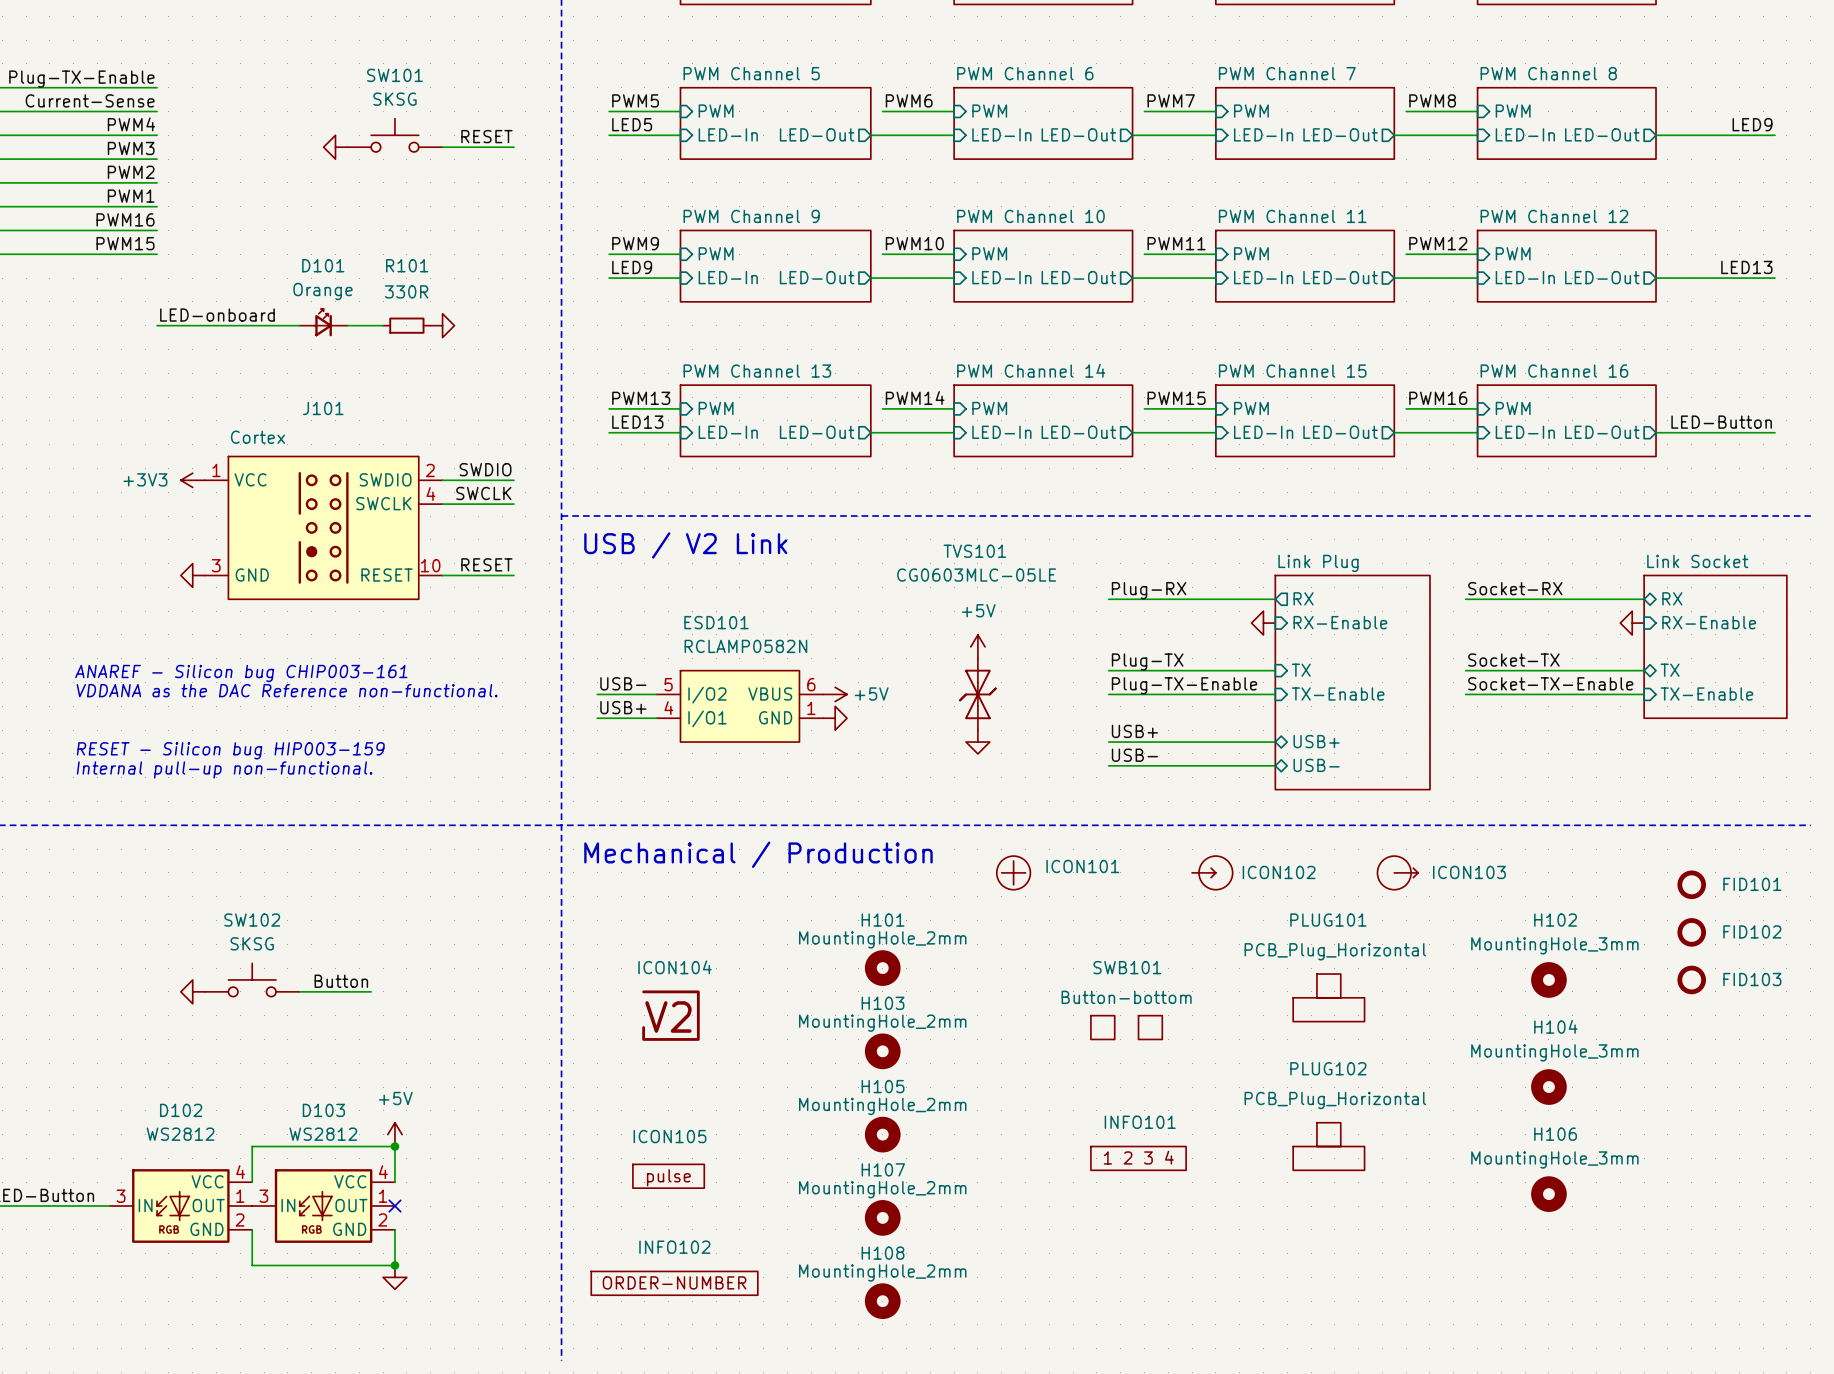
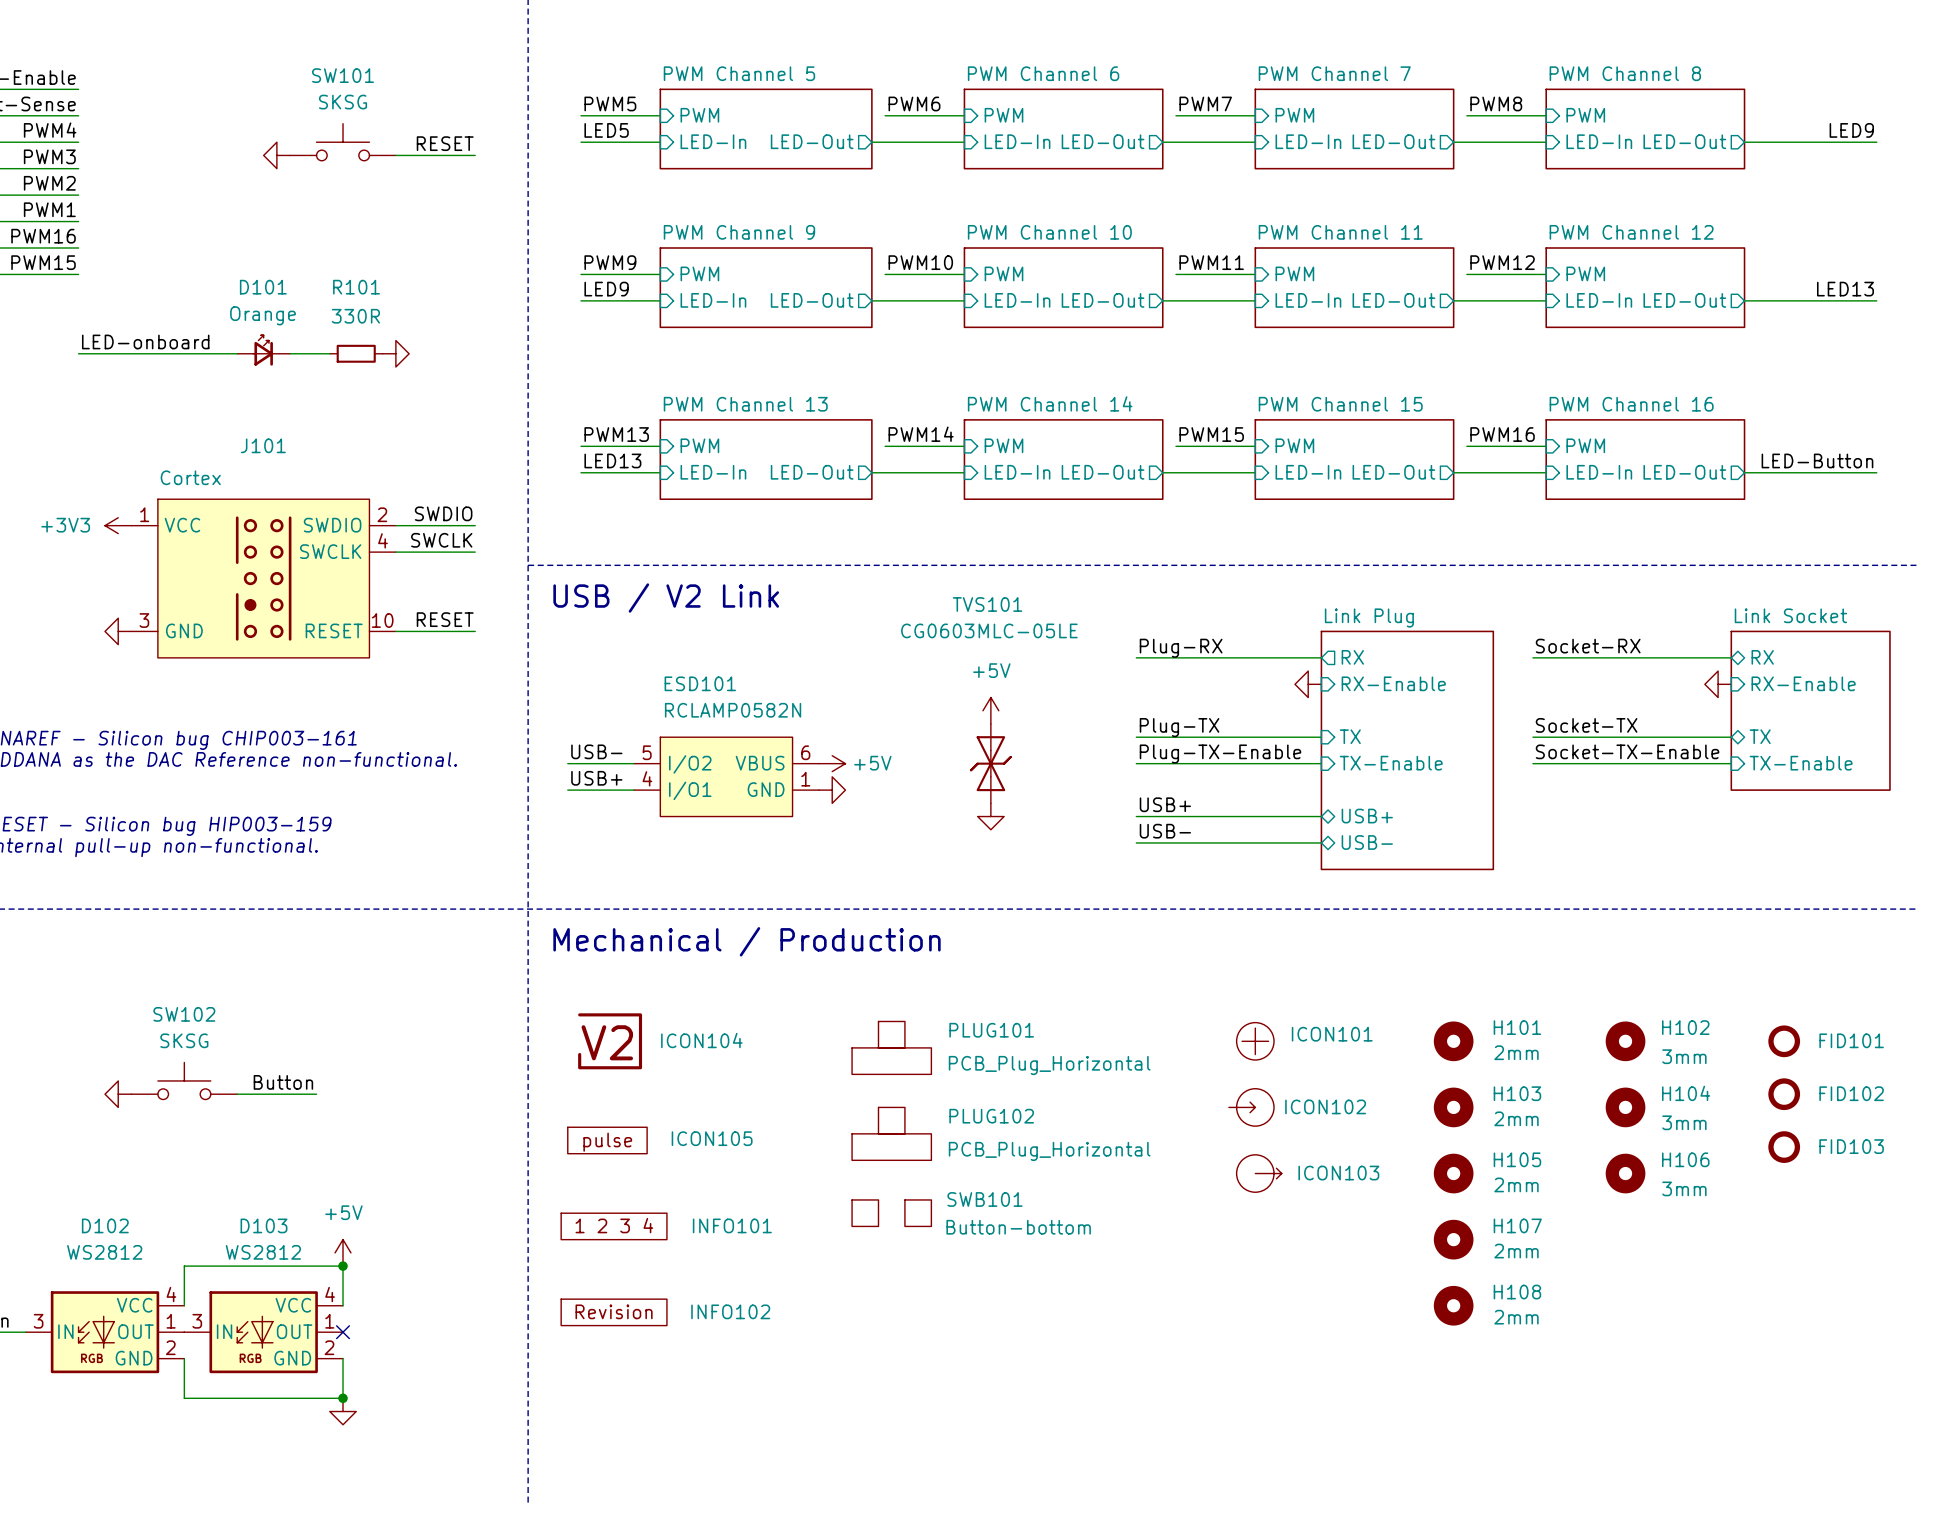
ICON101 position: (1013, 872) -> (1255, 1041)
ICON102 position: (1212, 872) -> (1251, 1107)
ICON103 position: (1397, 872) -> (1259, 1173)
FID101 position: (1691, 884) -> (1784, 1041)
H101 name position: H101 (883, 920) -> H101 (1517, 1027)
PLUG101 name position: PLUG101 (1328, 920) -> PLUG101 (991, 1030)
H102 name position: H102 (1555, 920) -> H102 (1685, 1027)
FID102 position: (1691, 932) -> (1784, 1094)
H101 value: MountingHole_2mm (882, 939) -> 2mm (1516, 1052)
H102 value: MountingHole_3mm (1554, 945) -> 3mm (1684, 1056)
PLUG101 value position: PCB_Plug_Horizontal (1335, 951) -> PCB_Plug_Horizontal (1049, 1065)
ICON104 name position: ICON104 (675, 967) -> ICON104 (701, 1040)
SWB101 name position: SWB101 (1127, 967) -> SWB101 (985, 1199)
H101 position: (882, 968) -> (1453, 1041)
H102 position: (1548, 979) -> (1625, 1041)
FID103 position: (1691, 979) -> (1784, 1147)
SWB101 value position: Button-bottom (1126, 997) -> Button-bottom (1018, 1227)
PLUG101 position: (1328, 997) -> (891, 1047)
H103 name position: H103 (883, 1003) -> H103 (1517, 1093)
ICON104 position: (670, 1015) -> (610, 1041)
H103 value: MountingHole_2mm (882, 1023) -> 2mm (1516, 1118)
H104 name position: H104 (1555, 1026) -> H104 (1686, 1093)
SWB101 position: (1126, 1027) -> (891, 1213)
H103 position: (882, 1051) -> (1453, 1107)
H104 value: MountingHole_3mm (1554, 1052) -> 3mm (1684, 1122)
PLUG102 name position: PLUG102 (1328, 1068) -> PLUG102 (991, 1116)
H105 name position: H105 (883, 1086) -> H105 (1517, 1159)
H104 position: (1548, 1087) -> (1625, 1107)
PLUG102 value position: PCB_Plug_Horizontal (1335, 1100) -> PCB_Plug_Horizontal (1049, 1151)
H105 value: MountingHole_2mm (882, 1106) -> 2mm (1516, 1184)
INFO101 name position: INFO101 (1140, 1122) -> INFO101 (732, 1225)
H105 position: (882, 1134) -> (1453, 1173)
H106 name position: H106 (1555, 1134) -> H106 (1685, 1159)
ICON105 name position: ICON105 (669, 1136) -> ICON105 (712, 1138)
ICON105 position: (632, 1146) -> (567, 1107)
PLUG102 position: (1328, 1146) -> (891, 1133)
INFO101 position: (1138, 1158) -> (614, 1226)
H106 value: MountingHole_3mm (1554, 1159) -> 3mm (1684, 1188)
H107 name position: H107 (883, 1169) -> H107 (1517, 1225)
H107 value: MountingHole_2mm (882, 1189) -> 2mm (1516, 1251)
H106 position: (1548, 1194) -> (1625, 1173)
H107 position: (882, 1217) -> (1453, 1239)
INFO102 name position: INFO102 (674, 1247) -> INFO102 (730, 1311)
H108 name position: H108 (883, 1253) -> H108 (1517, 1292)
INFO102 symbol: [591, 1271, 758, 1296] -> [561, 1299, 667, 1326]
H108 value: MountingHole_2mm (882, 1272) -> 2mm (1516, 1317)
H108 position: (882, 1301) -> (1453, 1305)

